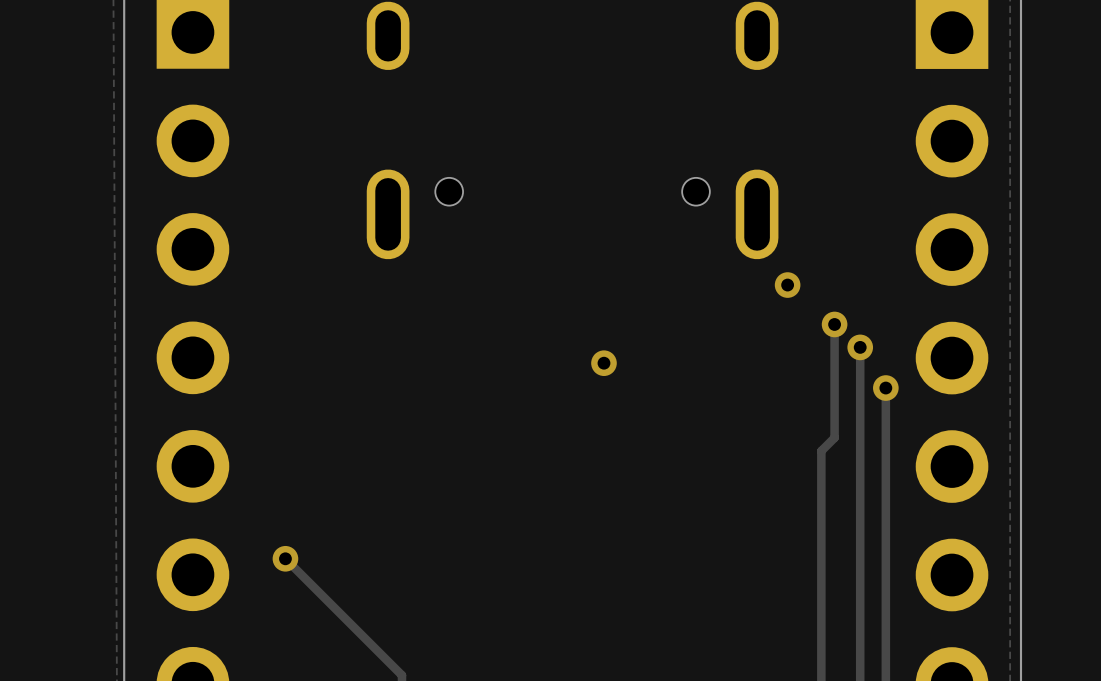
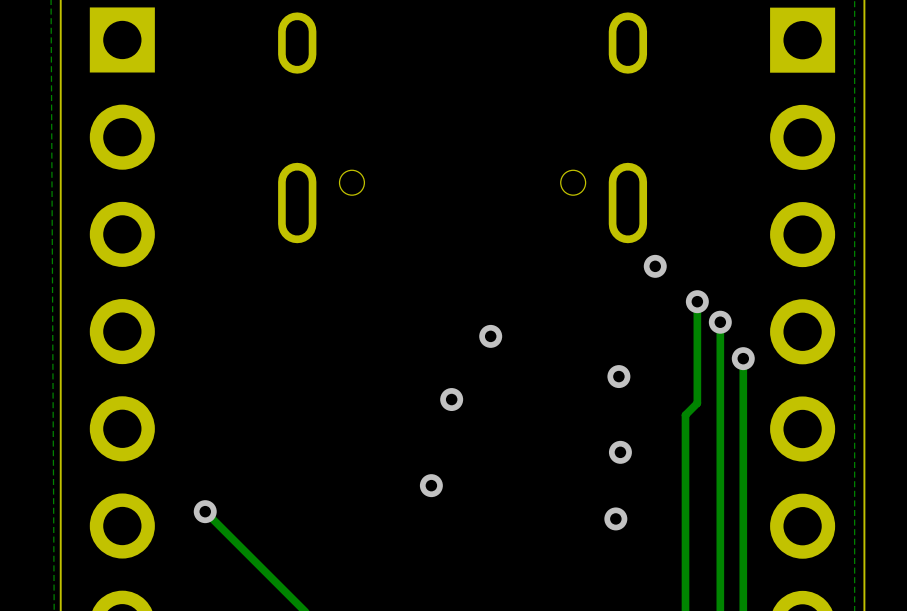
via: none -> (618, 376)
via: none -> (451, 399)
via: none -> (620, 452)
via: none -> (431, 485)
via: none -> (615, 518)

